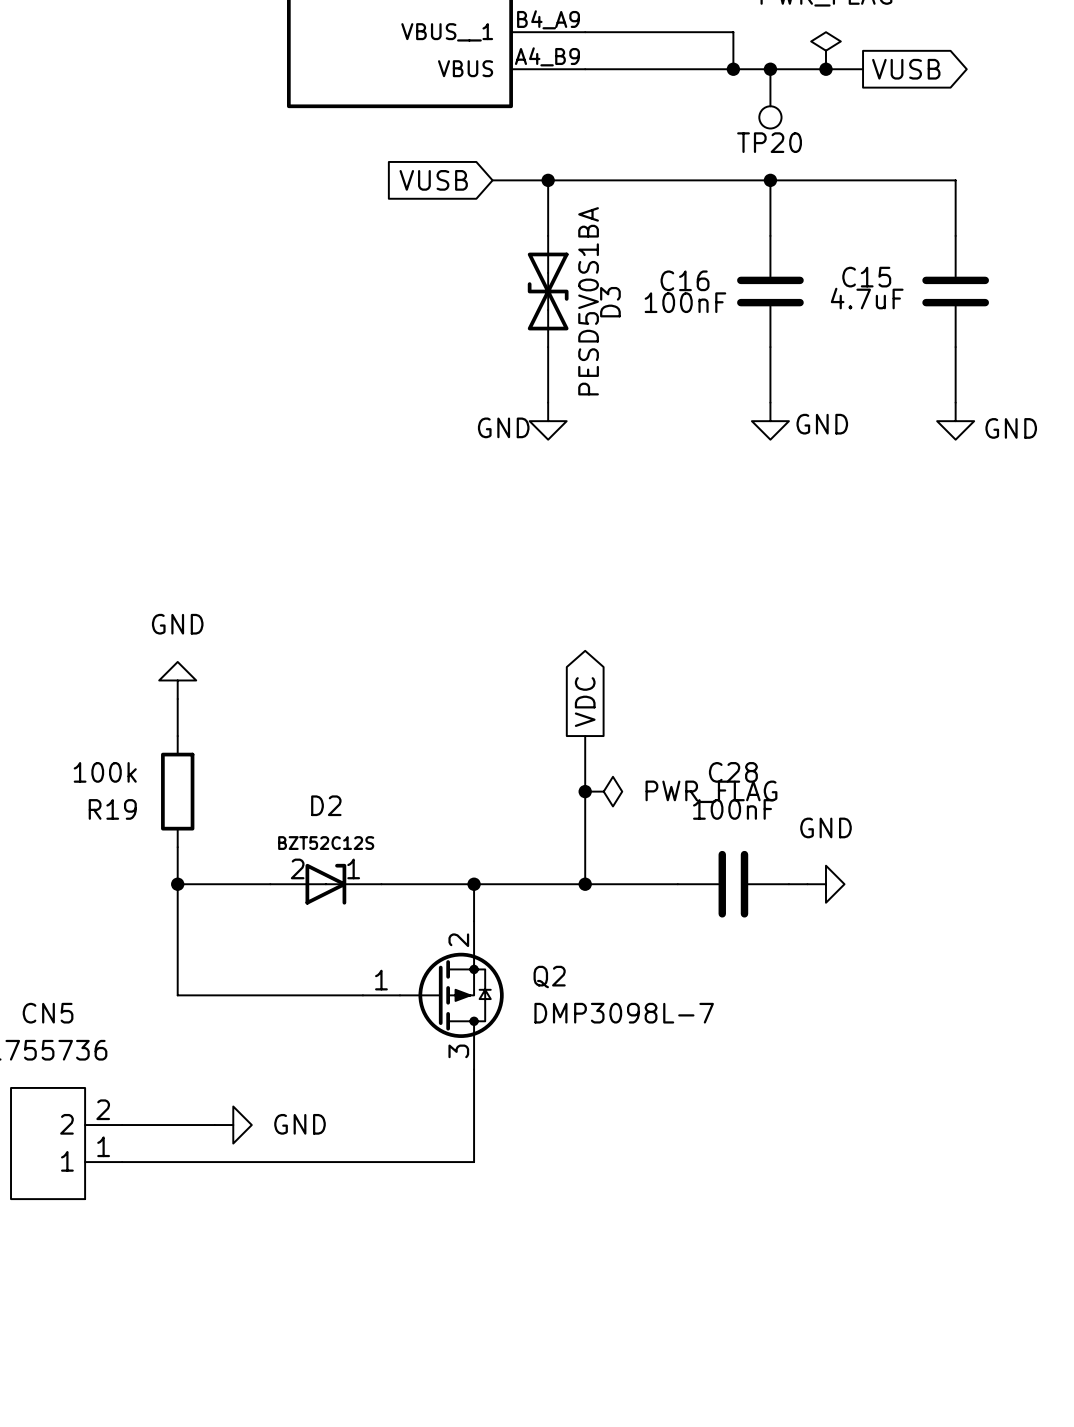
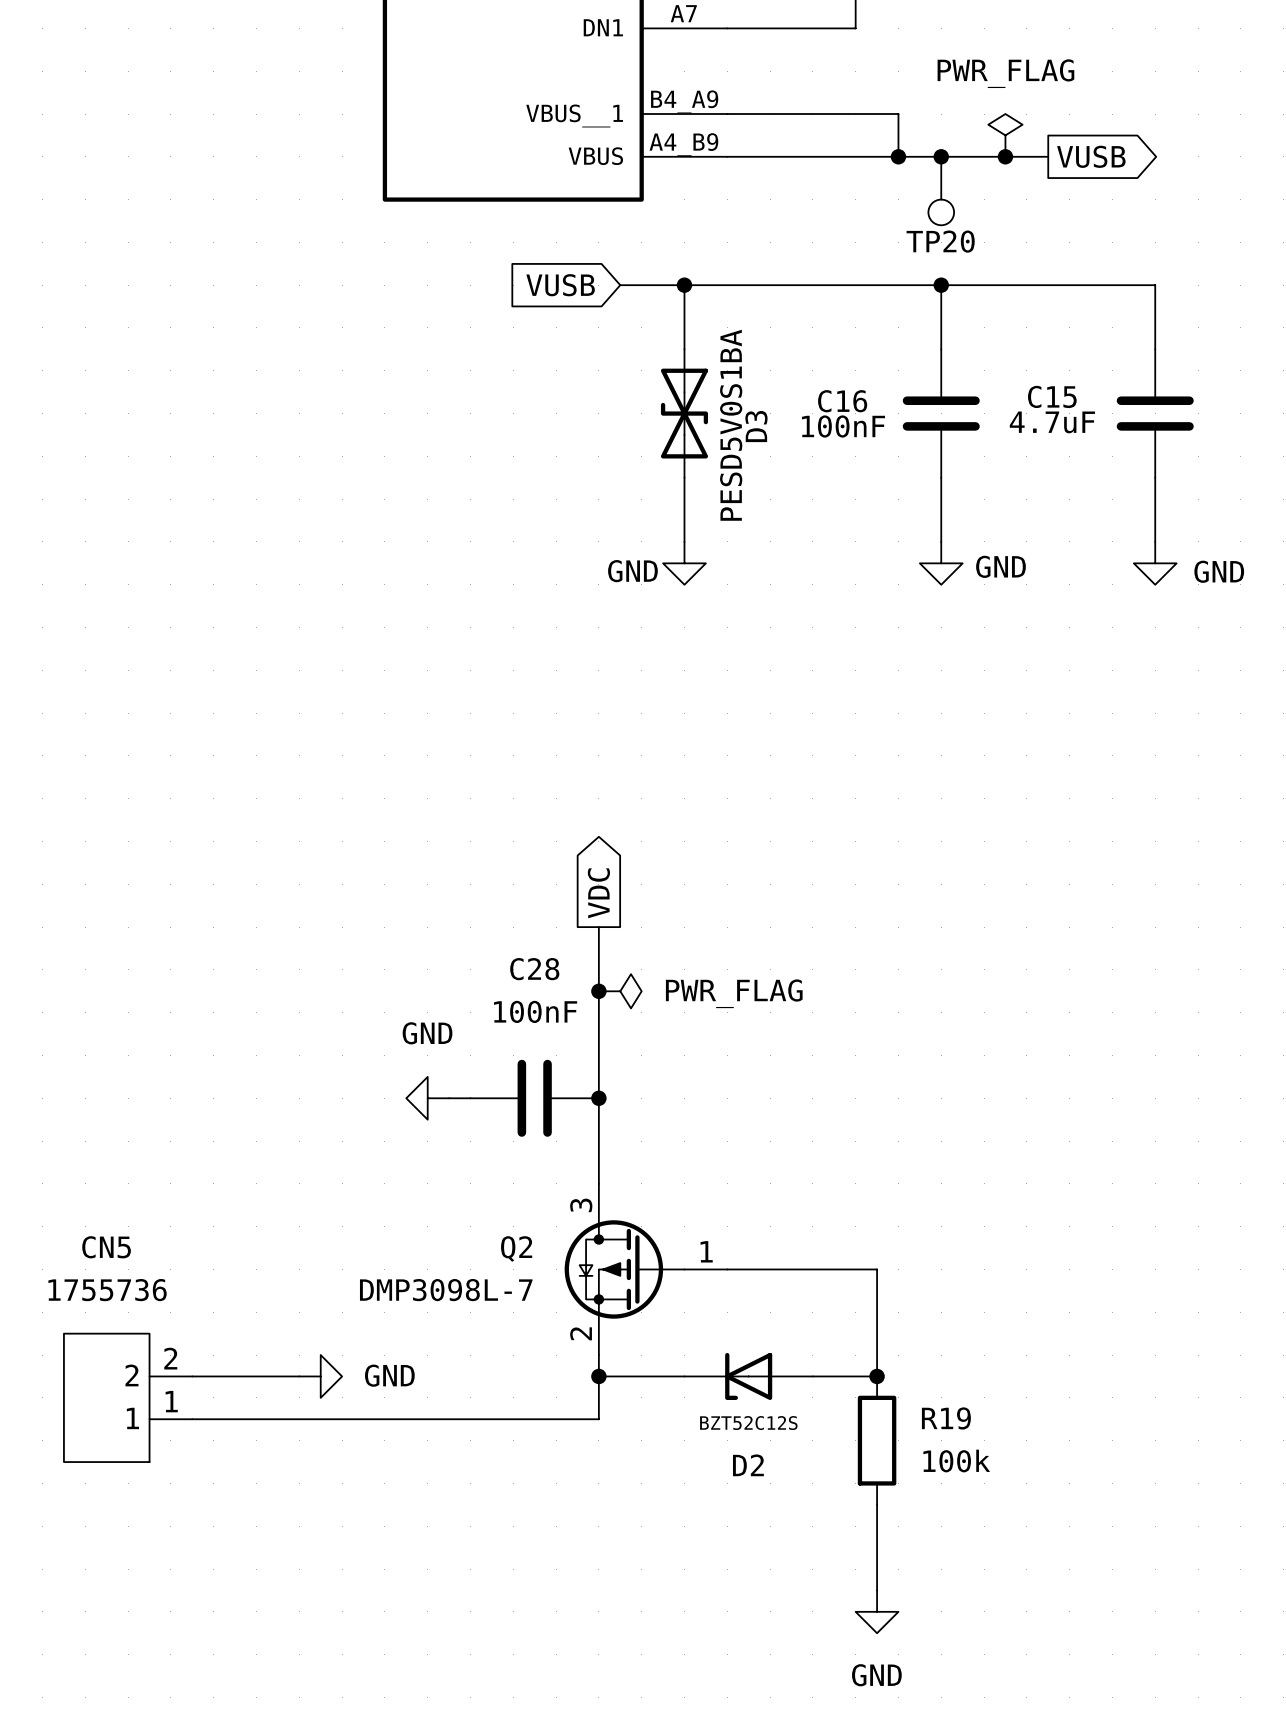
power symbol: GND (177, 680) -> none
wire: (177, 699) (177, 736) -> none
global label position: VDC (585, 702) -> VDC (598, 893)
wire: (585, 736) (585, 884) -> (598, 927) (598, 1098)
R19 value position: 100k (105, 772) -> 100k (956, 1461)
R19 position: (177, 791) -> (877, 1440)
junction: none -> (598, 991)
junction: (585, 791) -> none
power symbol position: PWR_FLAG (603, 791) -> PWR_FLAG (620, 991)
D2 name position: D2 (326, 805) -> D2 (748, 1465)
R19 name position: R19 (112, 809) -> R19 (946, 1418)
D2 value position: BZT52C12S (326, 843) -> BZT52C12S (748, 1423)
wire: (177, 847) (177, 995) (362, 995) -> none
D2 symbol: [270, 863, 382, 905] -> [684, 1352, 813, 1400]
wire: (177, 884) (270, 884) -> none
junction: (177, 884) -> none
power symbol: none -> GND (427, 1098)
wire: (381, 884) (677, 884) -> none
junction: (585, 884) -> none
C28 position: (733, 884) -> (534, 1098)
wire: (788, 884) (807, 884) -> none
power symbol: GND (825, 884) -> none
Q2 name position: Q2 (549, 977) -> Q2 (516, 1249)
Q2 position: (433, 995) -> (645, 1269)
Q2 rotation: 0° (451, 995) -> 180° (624, 1269)
Q2 value position: DMP3098L-7 (624, 1013) -> DMP3098L-7 (446, 1290)
wire: none -> (727, 1269) (877, 1269) (877, 1376) (812, 1376)
wire: none -> (598, 1376) (684, 1376)
junction: none -> (598, 1376)
junction: none -> (877, 1376)
wire: none -> (877, 1504) (877, 1590)
power symbol: none -> GND (877, 1611)

